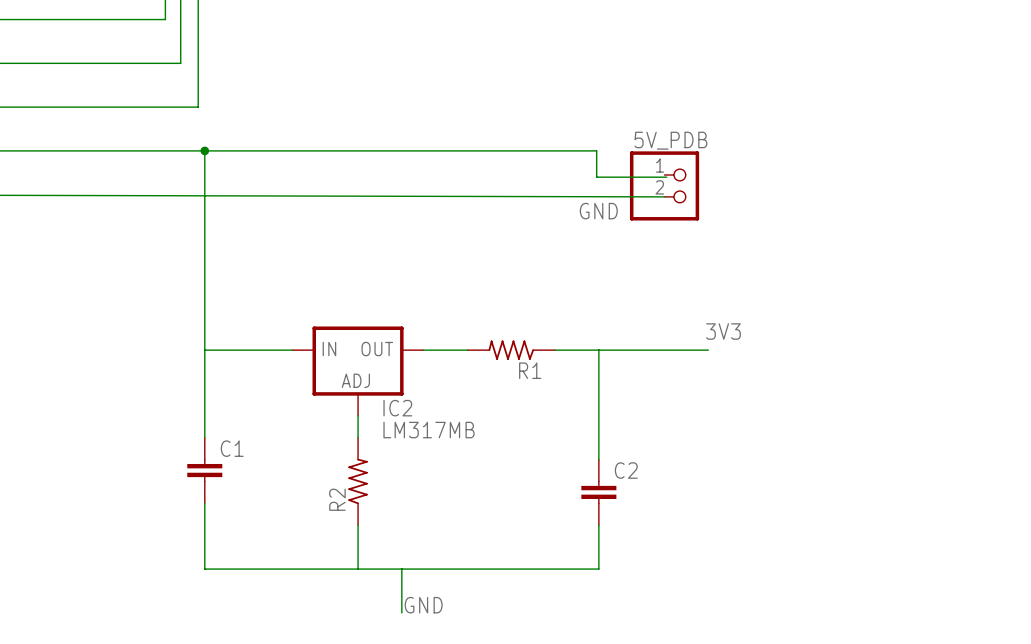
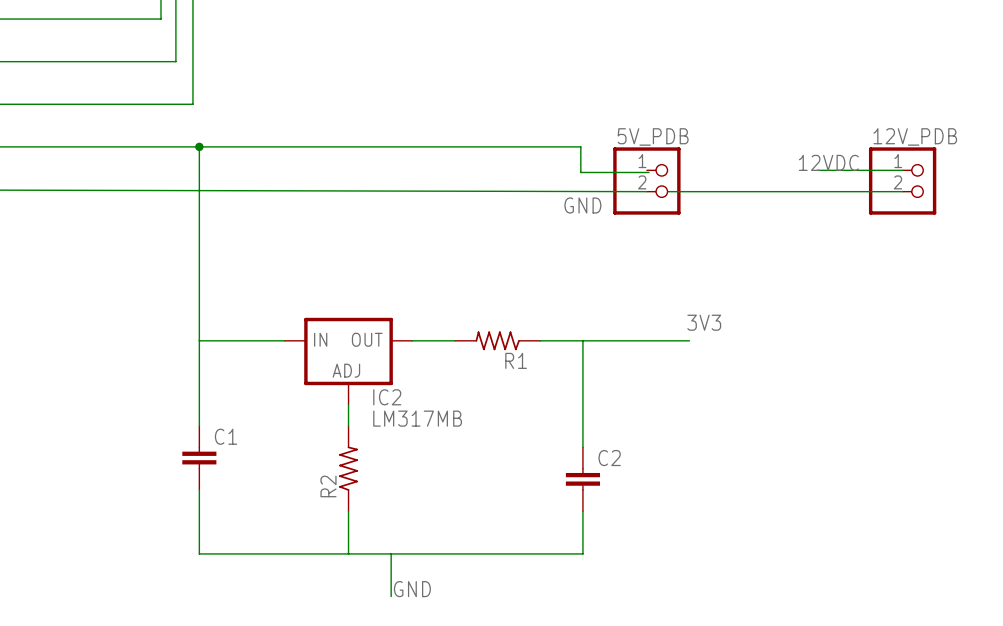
label: none -> 12VDC (828, 162)
wire: none -> (817, 170) (902, 170)
12V_PDB: none -> (902, 181)
wire: none -> (668, 191) (902, 191)

